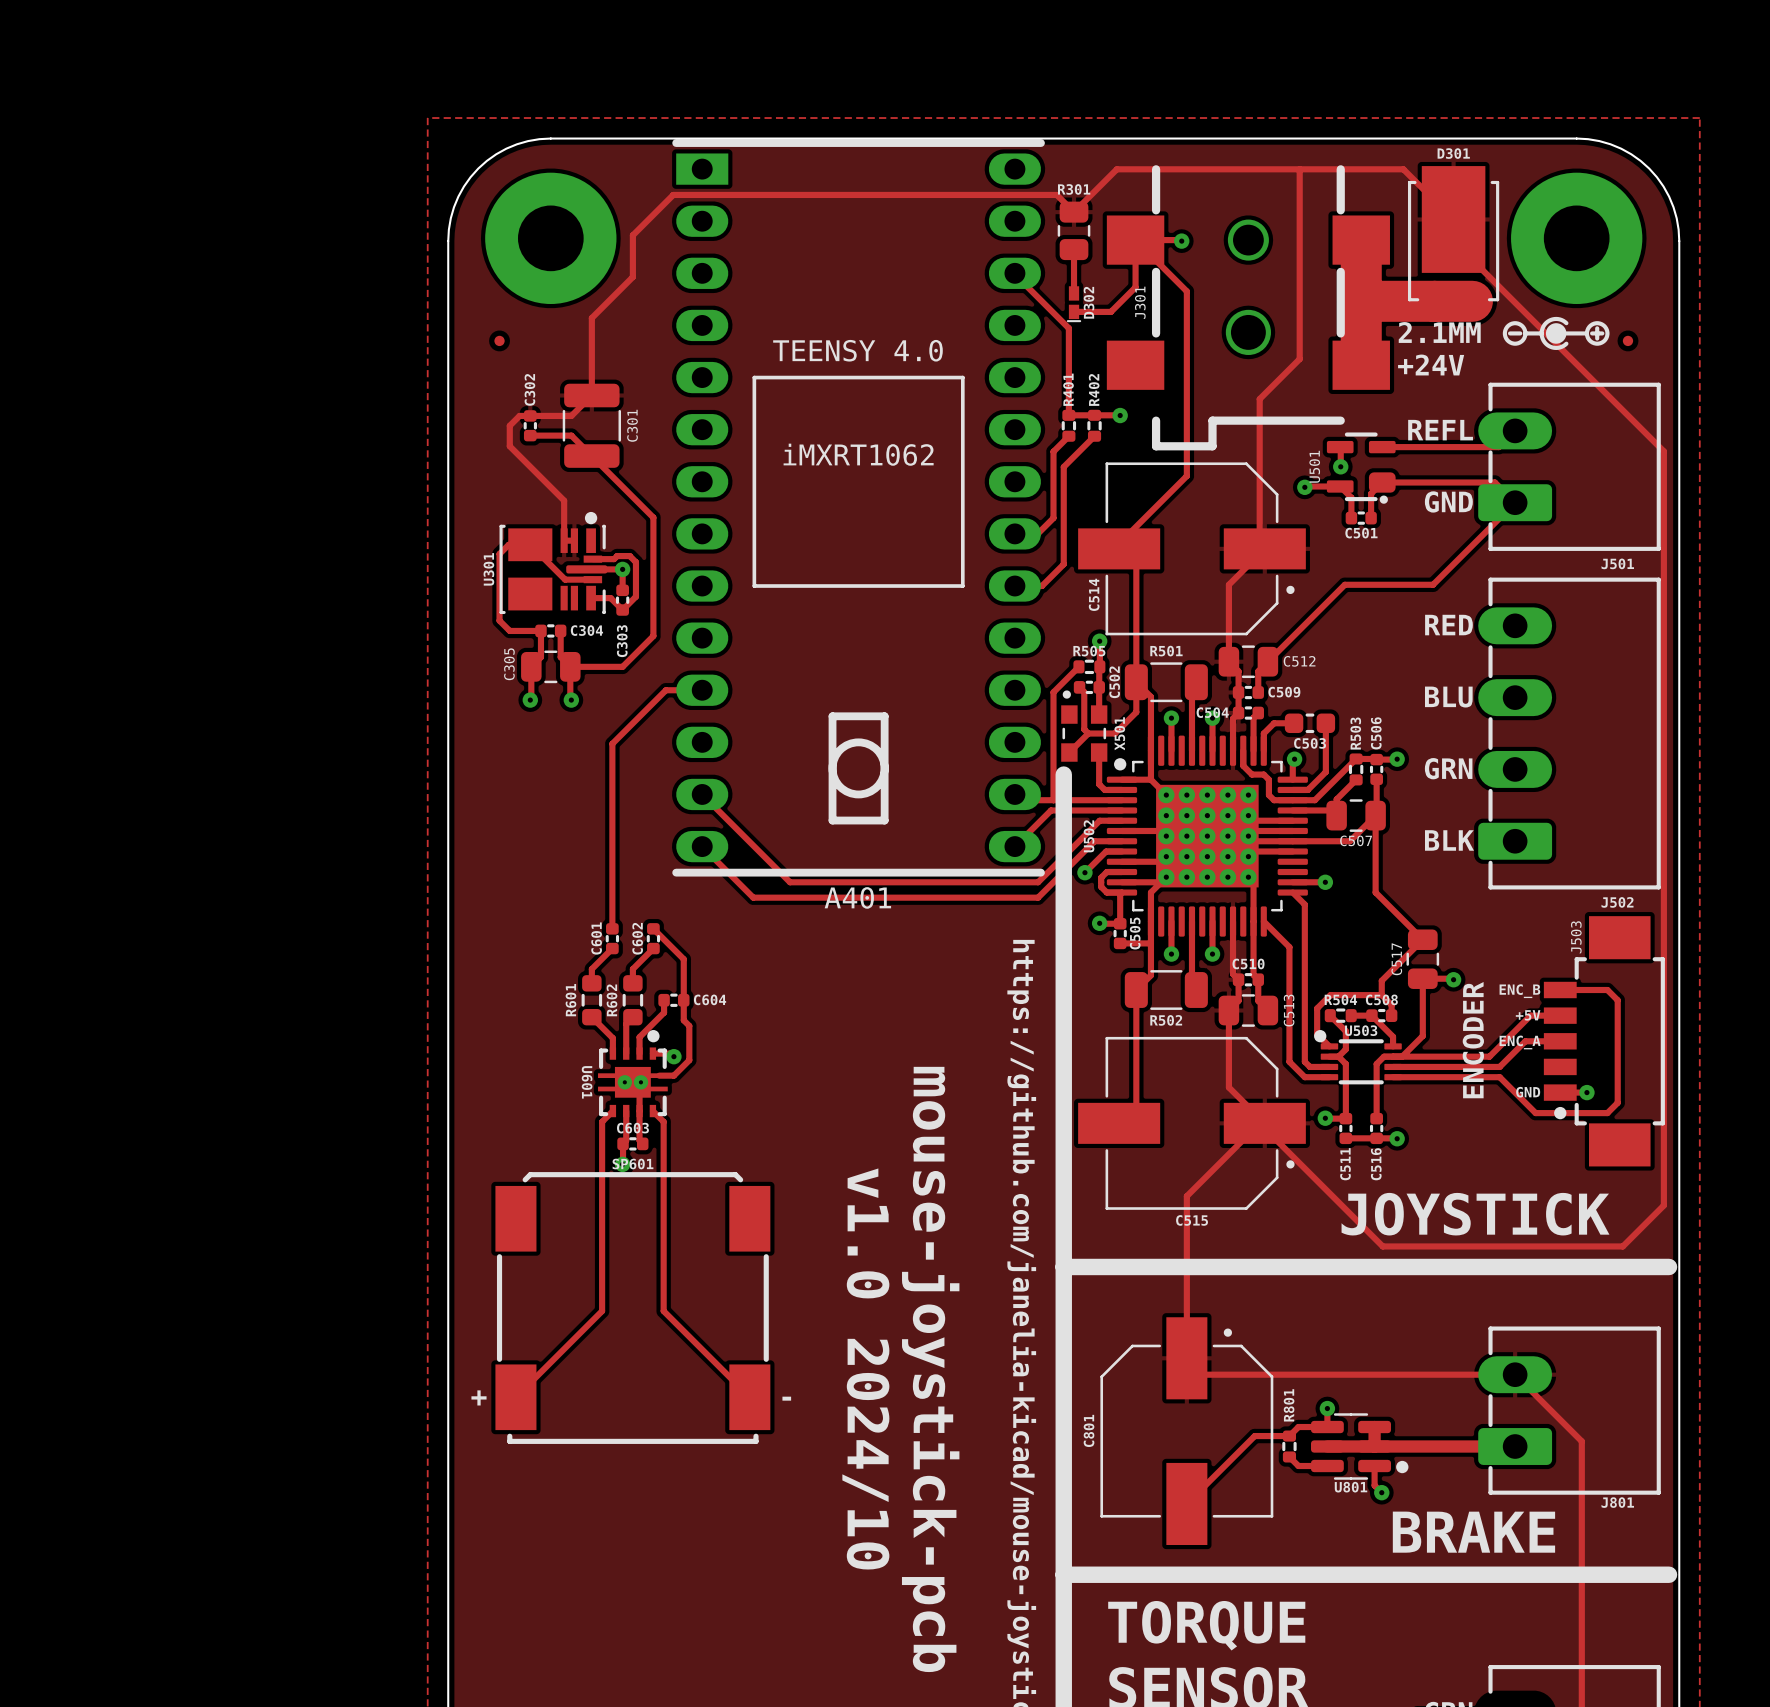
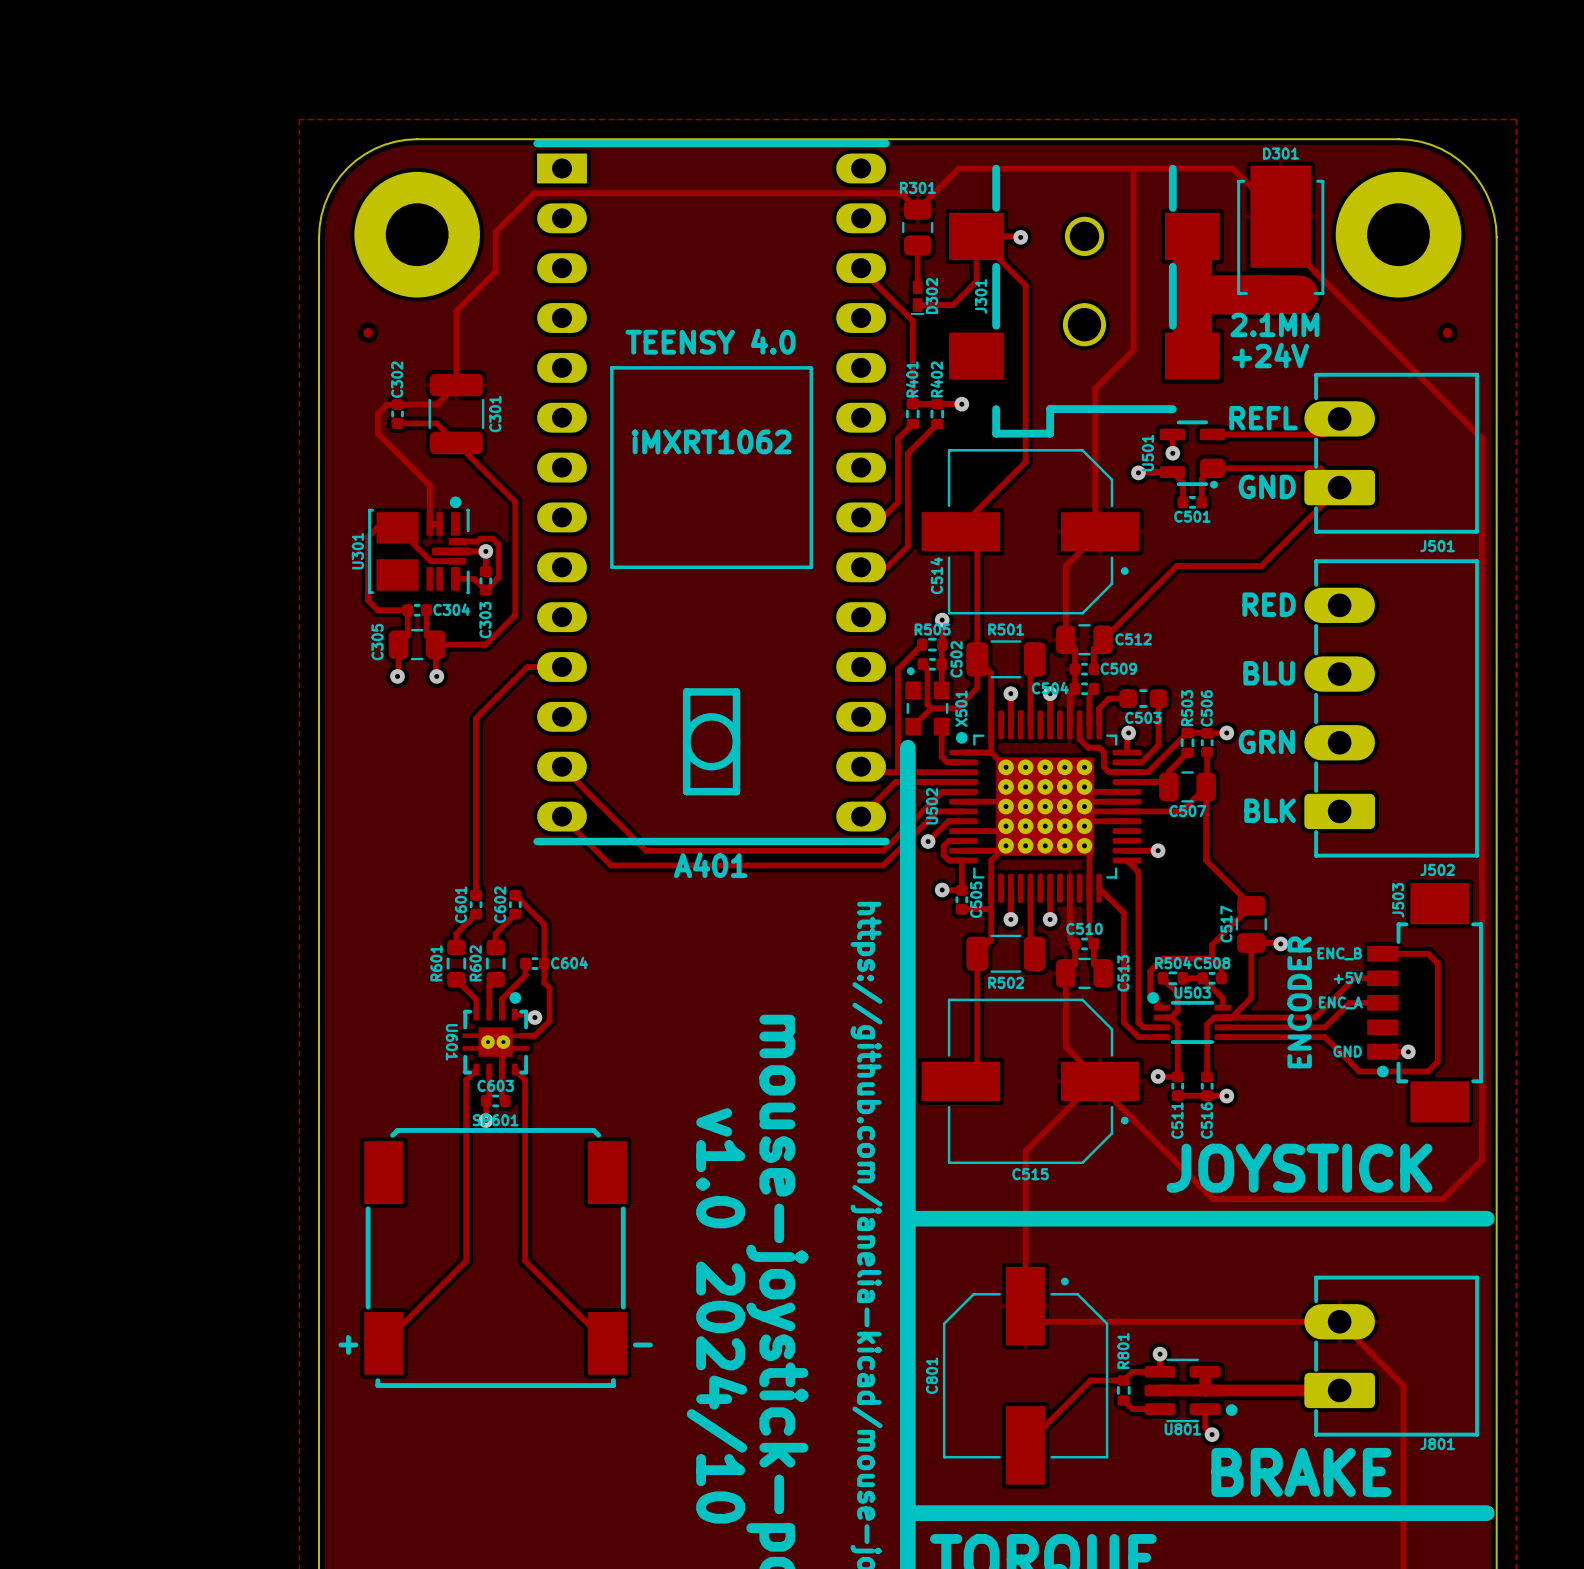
drawing: [1502, 316, 1610, 351] -> none

